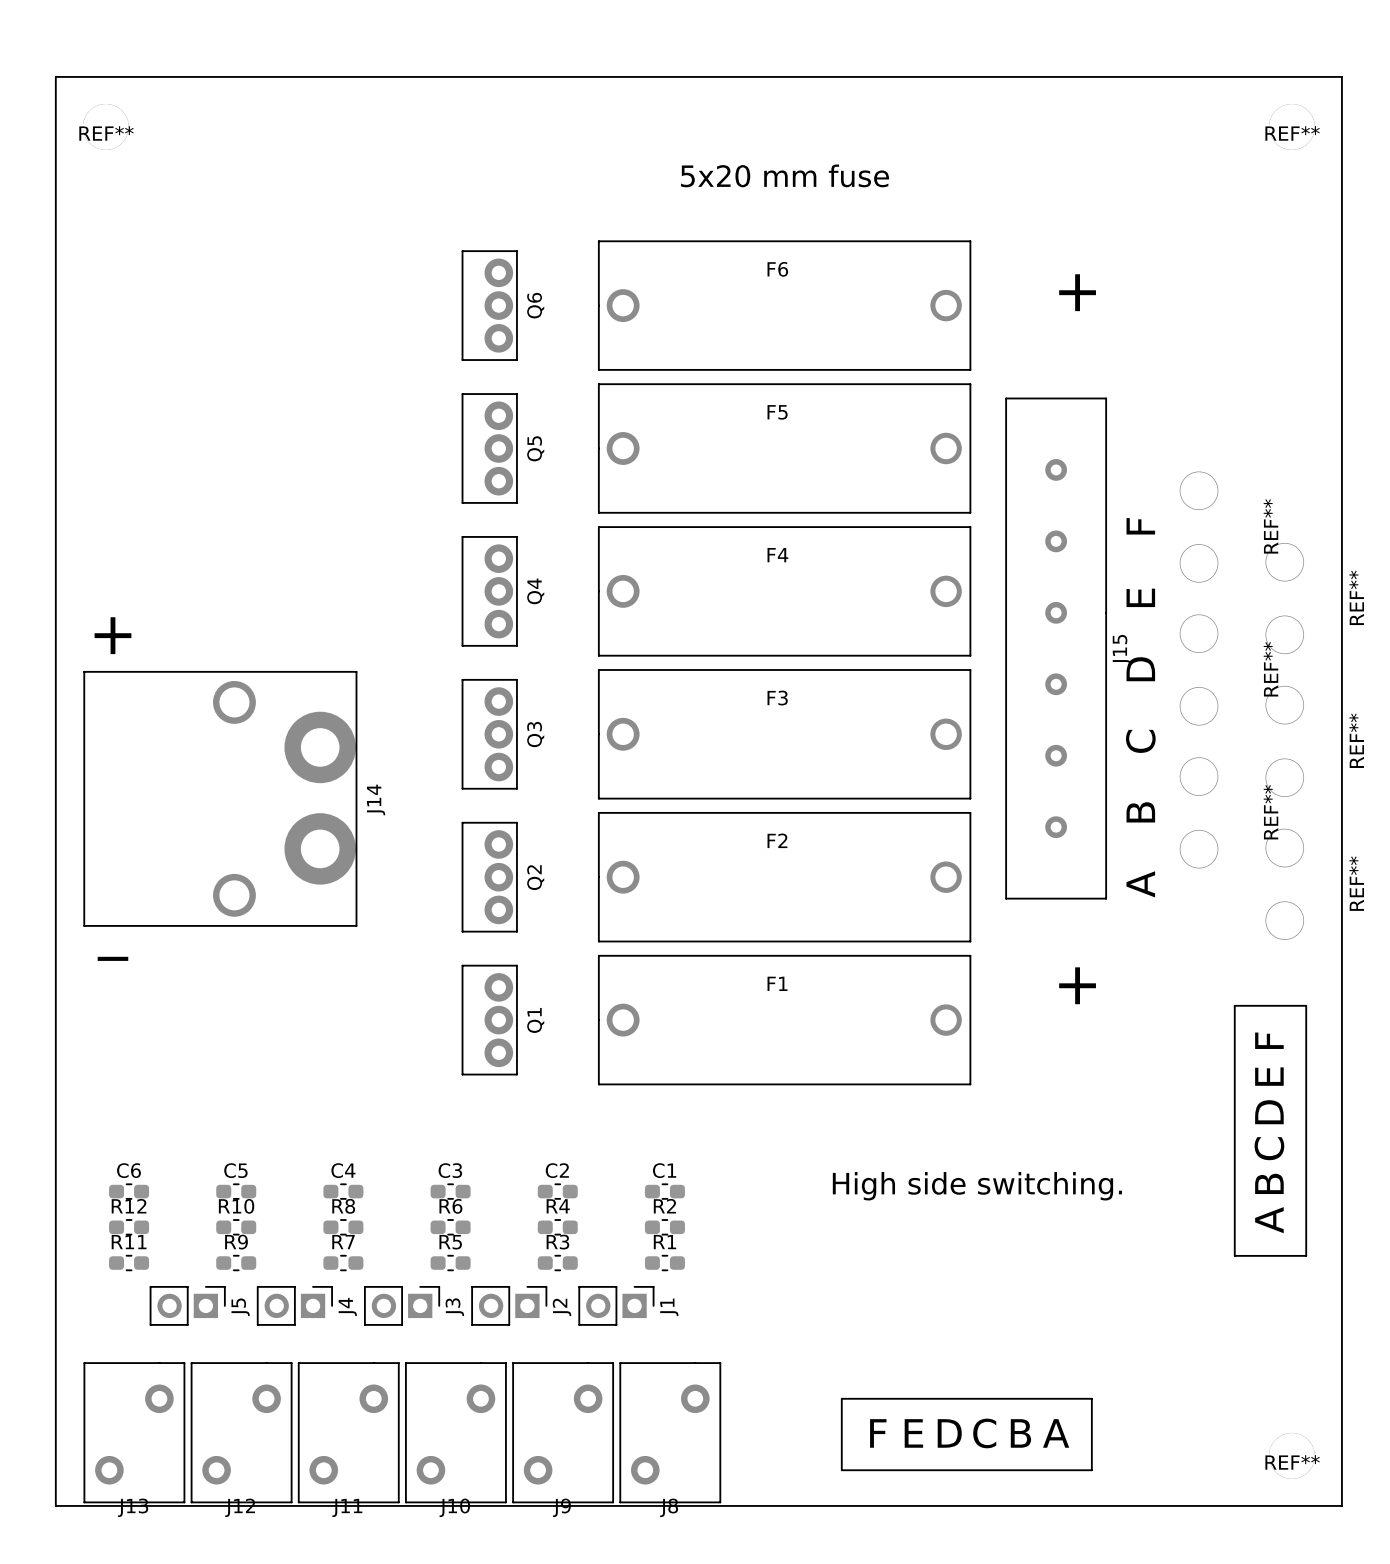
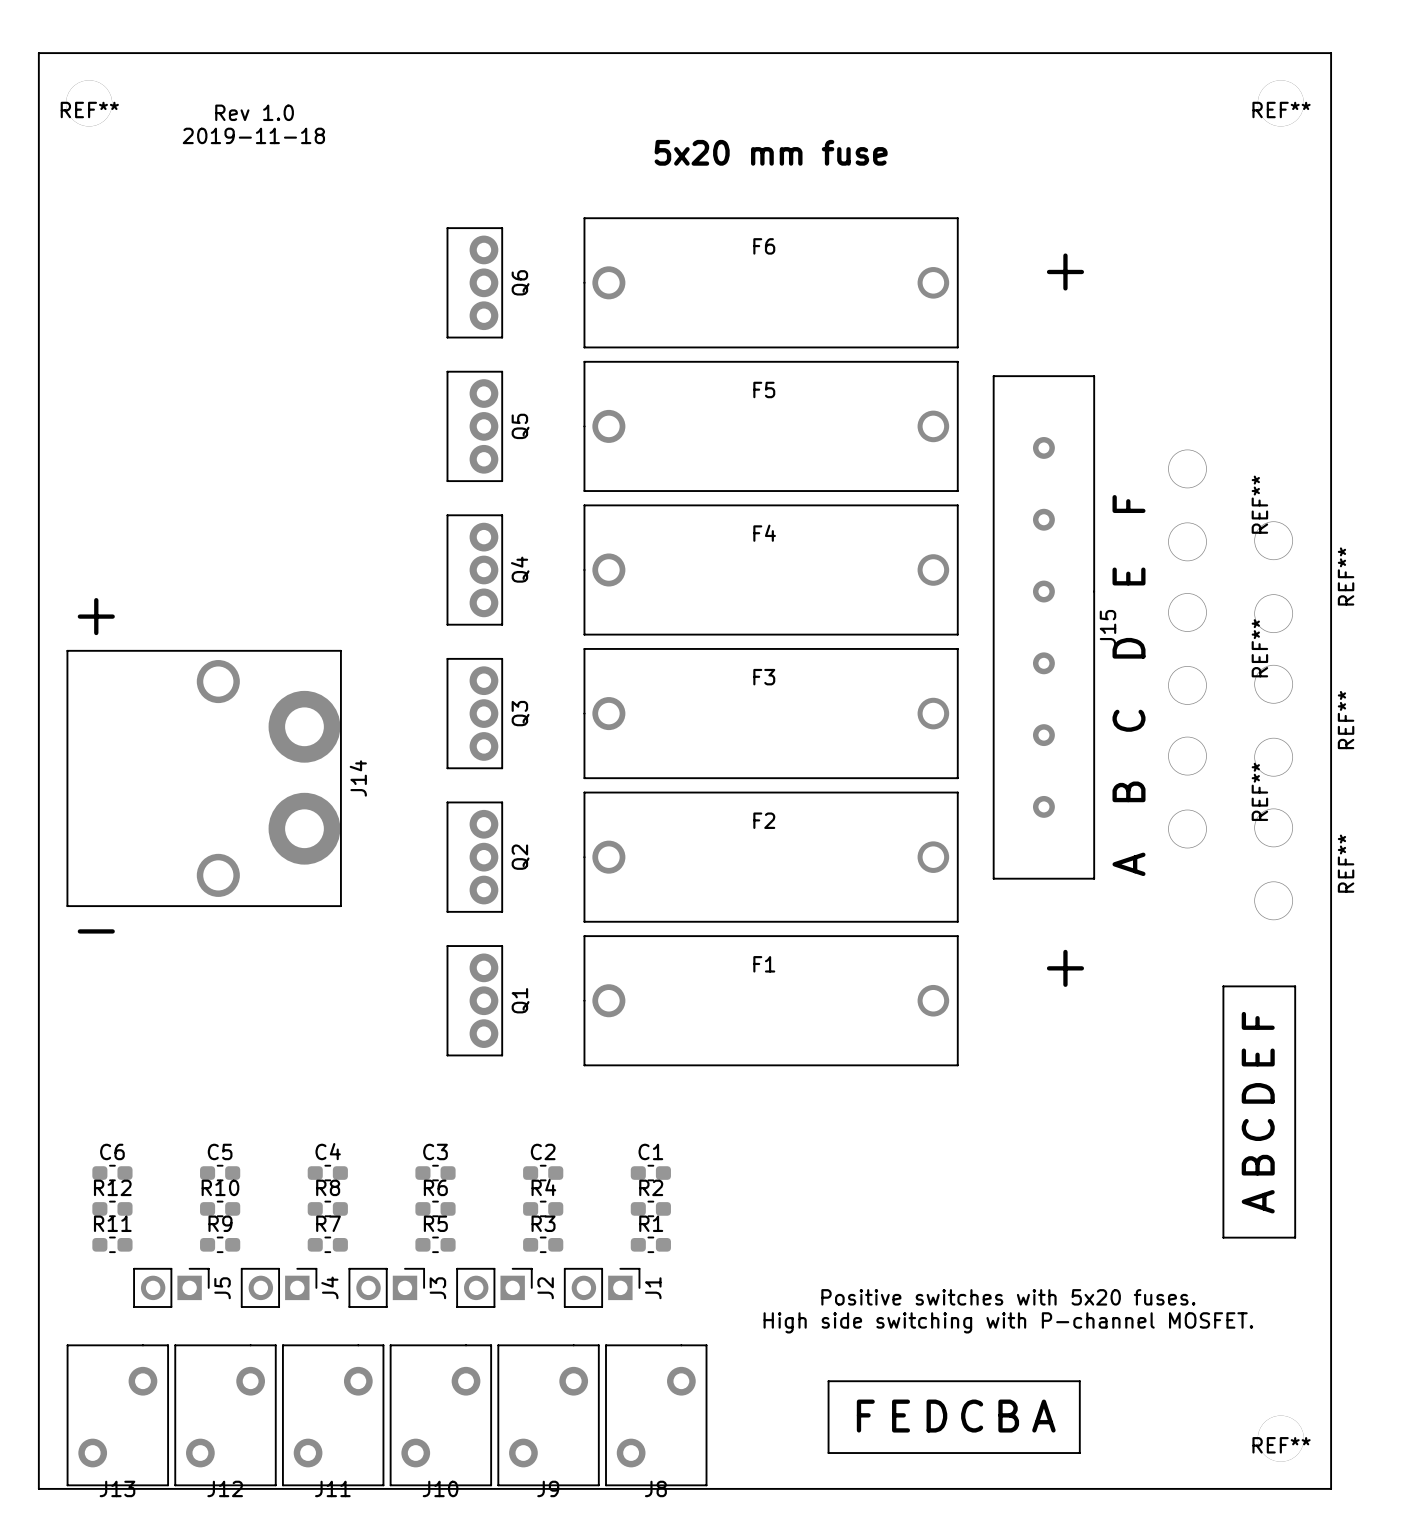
text: none -> Rev 1.0 (254, 112)
text: none -> 2019-11-18 (253, 135)
text: High side switching. (977, 1186) -> none
text: none -> Positive switches with 5x20 fuses. (1008, 1297)
text: none -> High side switching with P-channel MOSFET. (1008, 1322)

